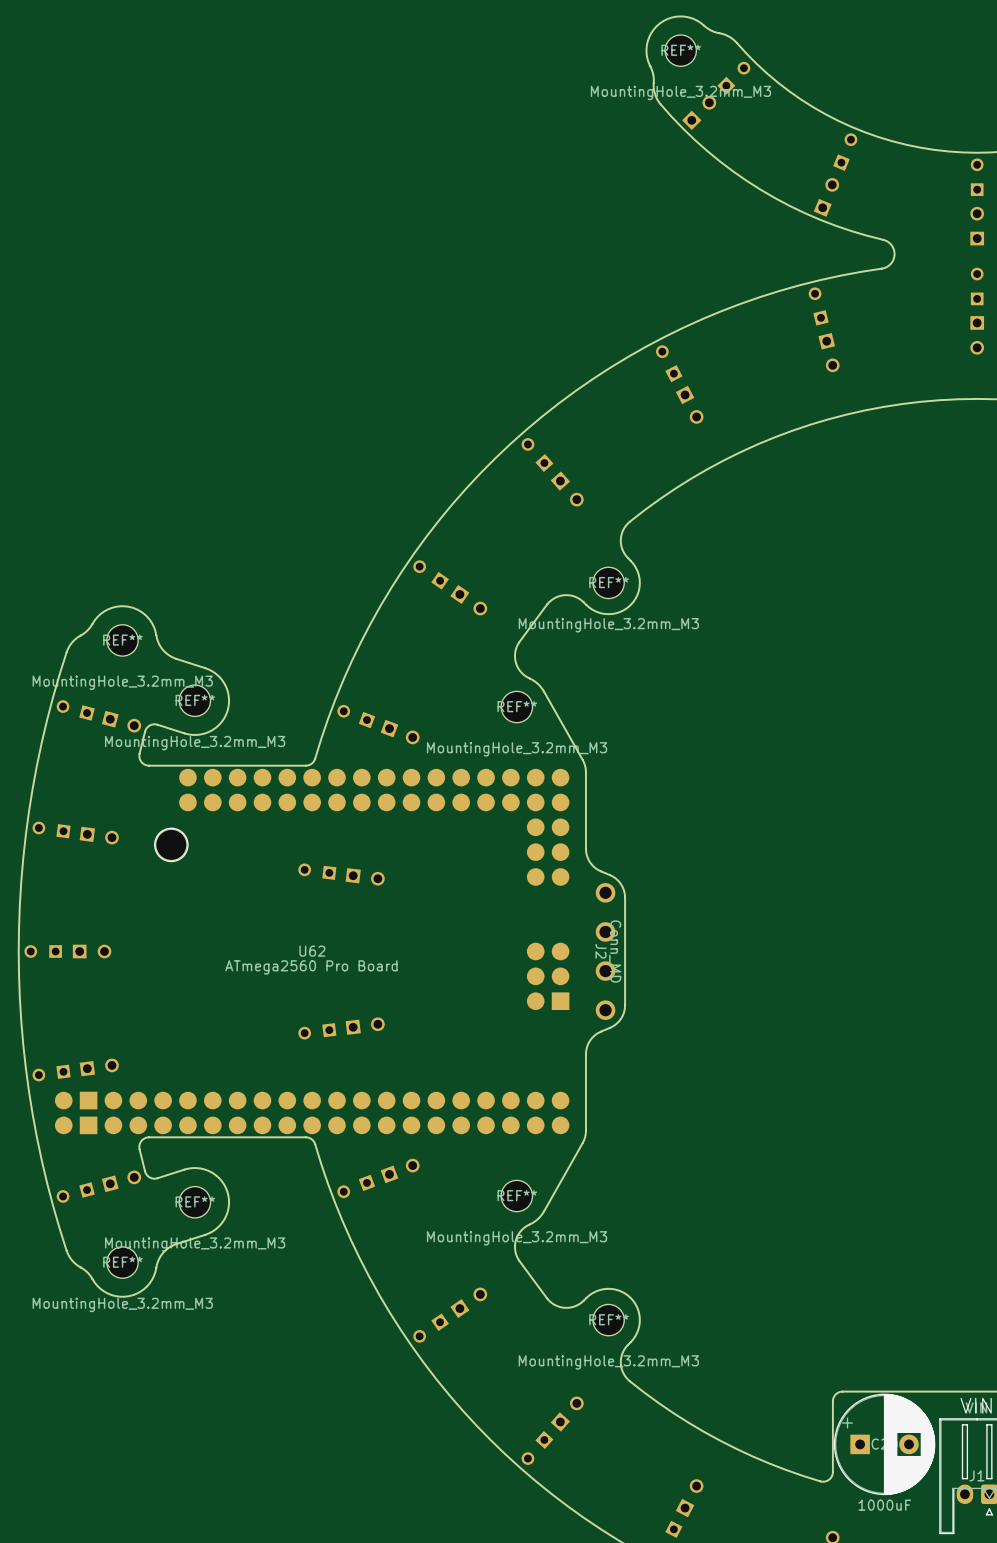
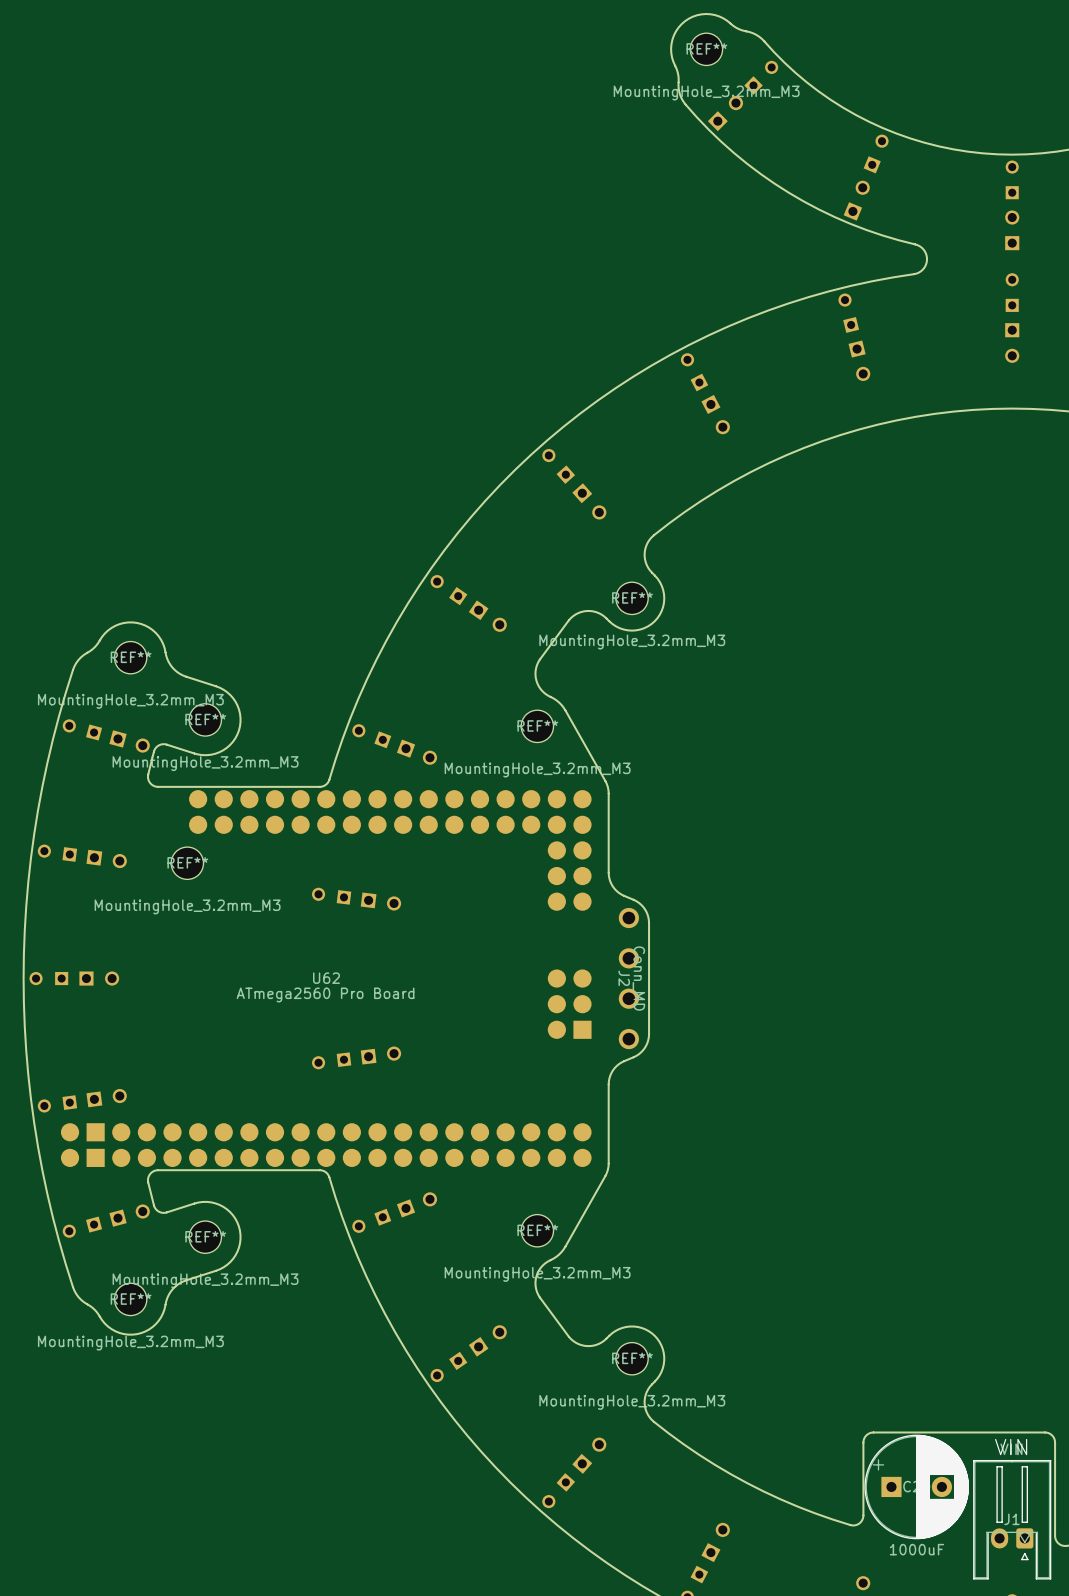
U62 footprint: [54, 768, 570, 1135] -> [60, 790, 592, 1167]
REF**: none -> MountingHole_3.2mm_M3 (187, 863)

